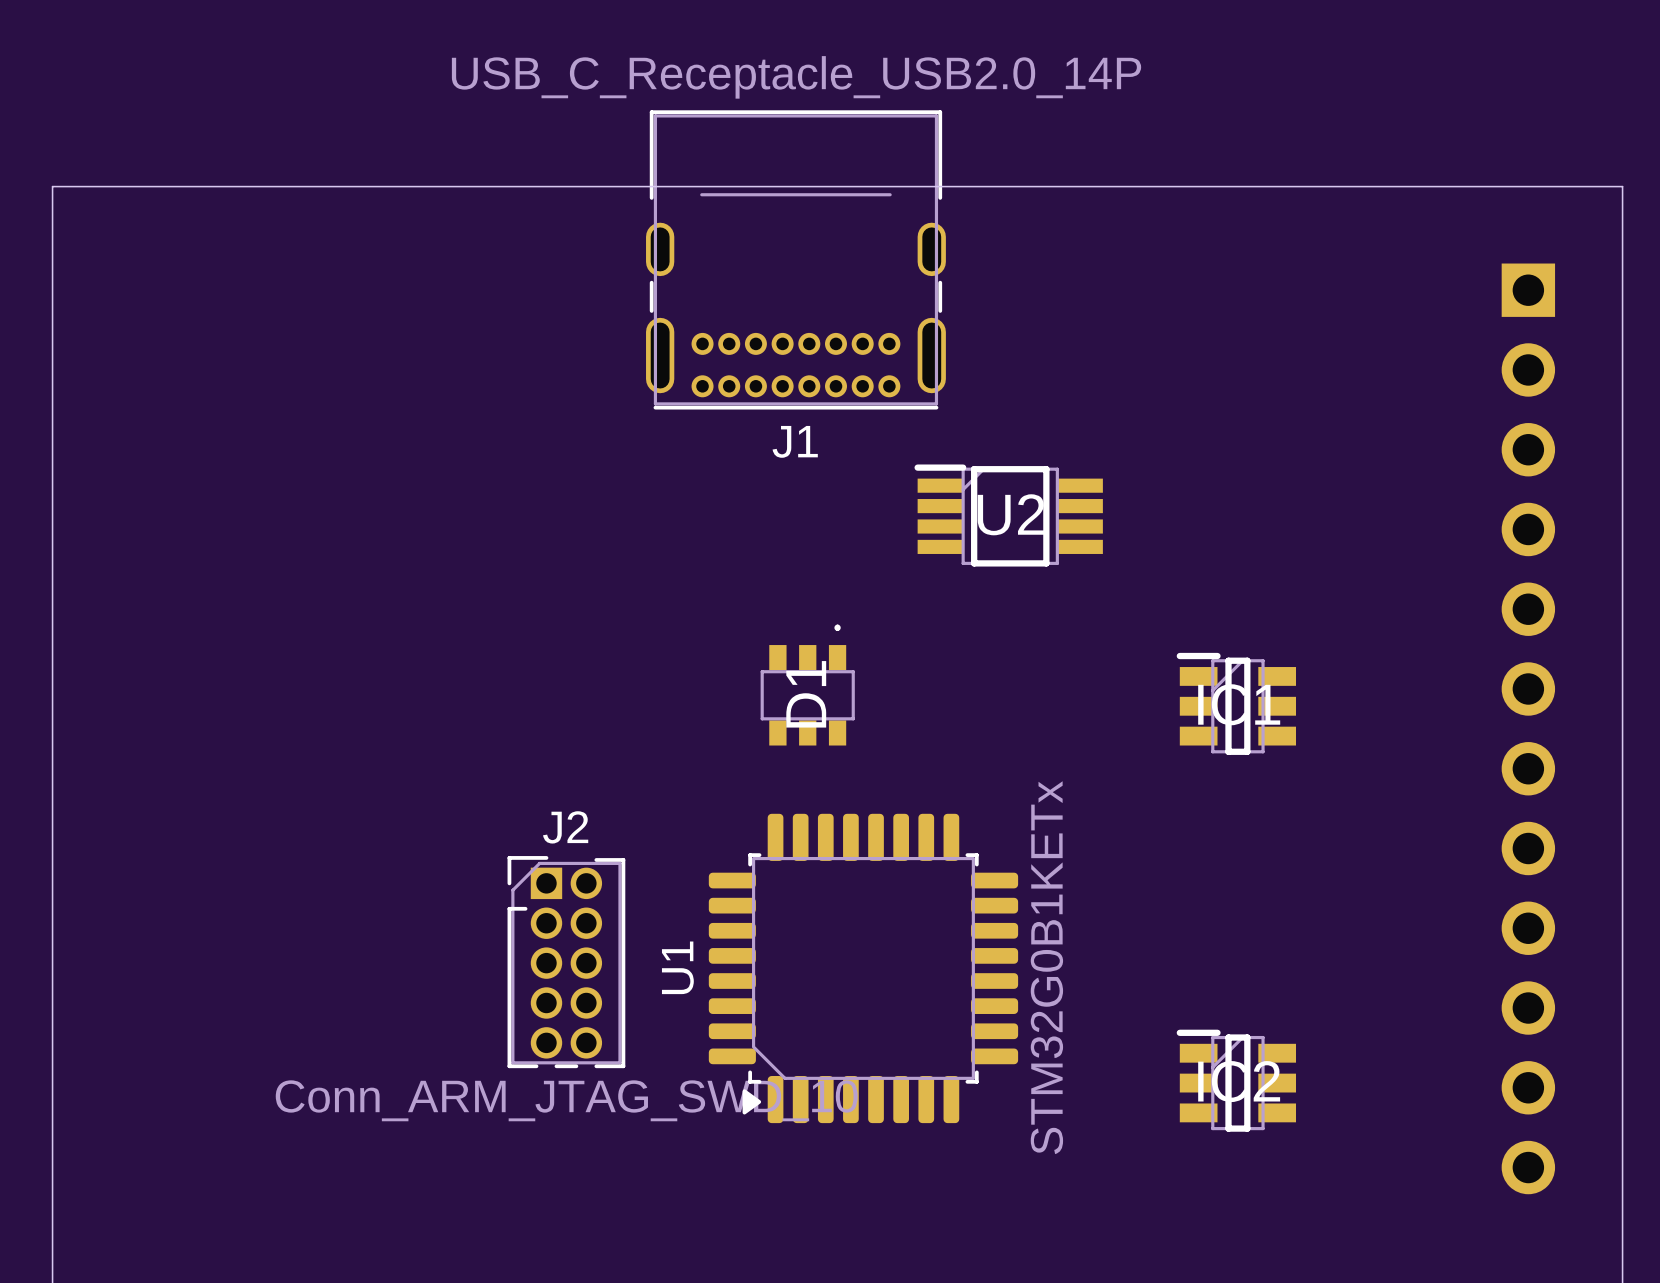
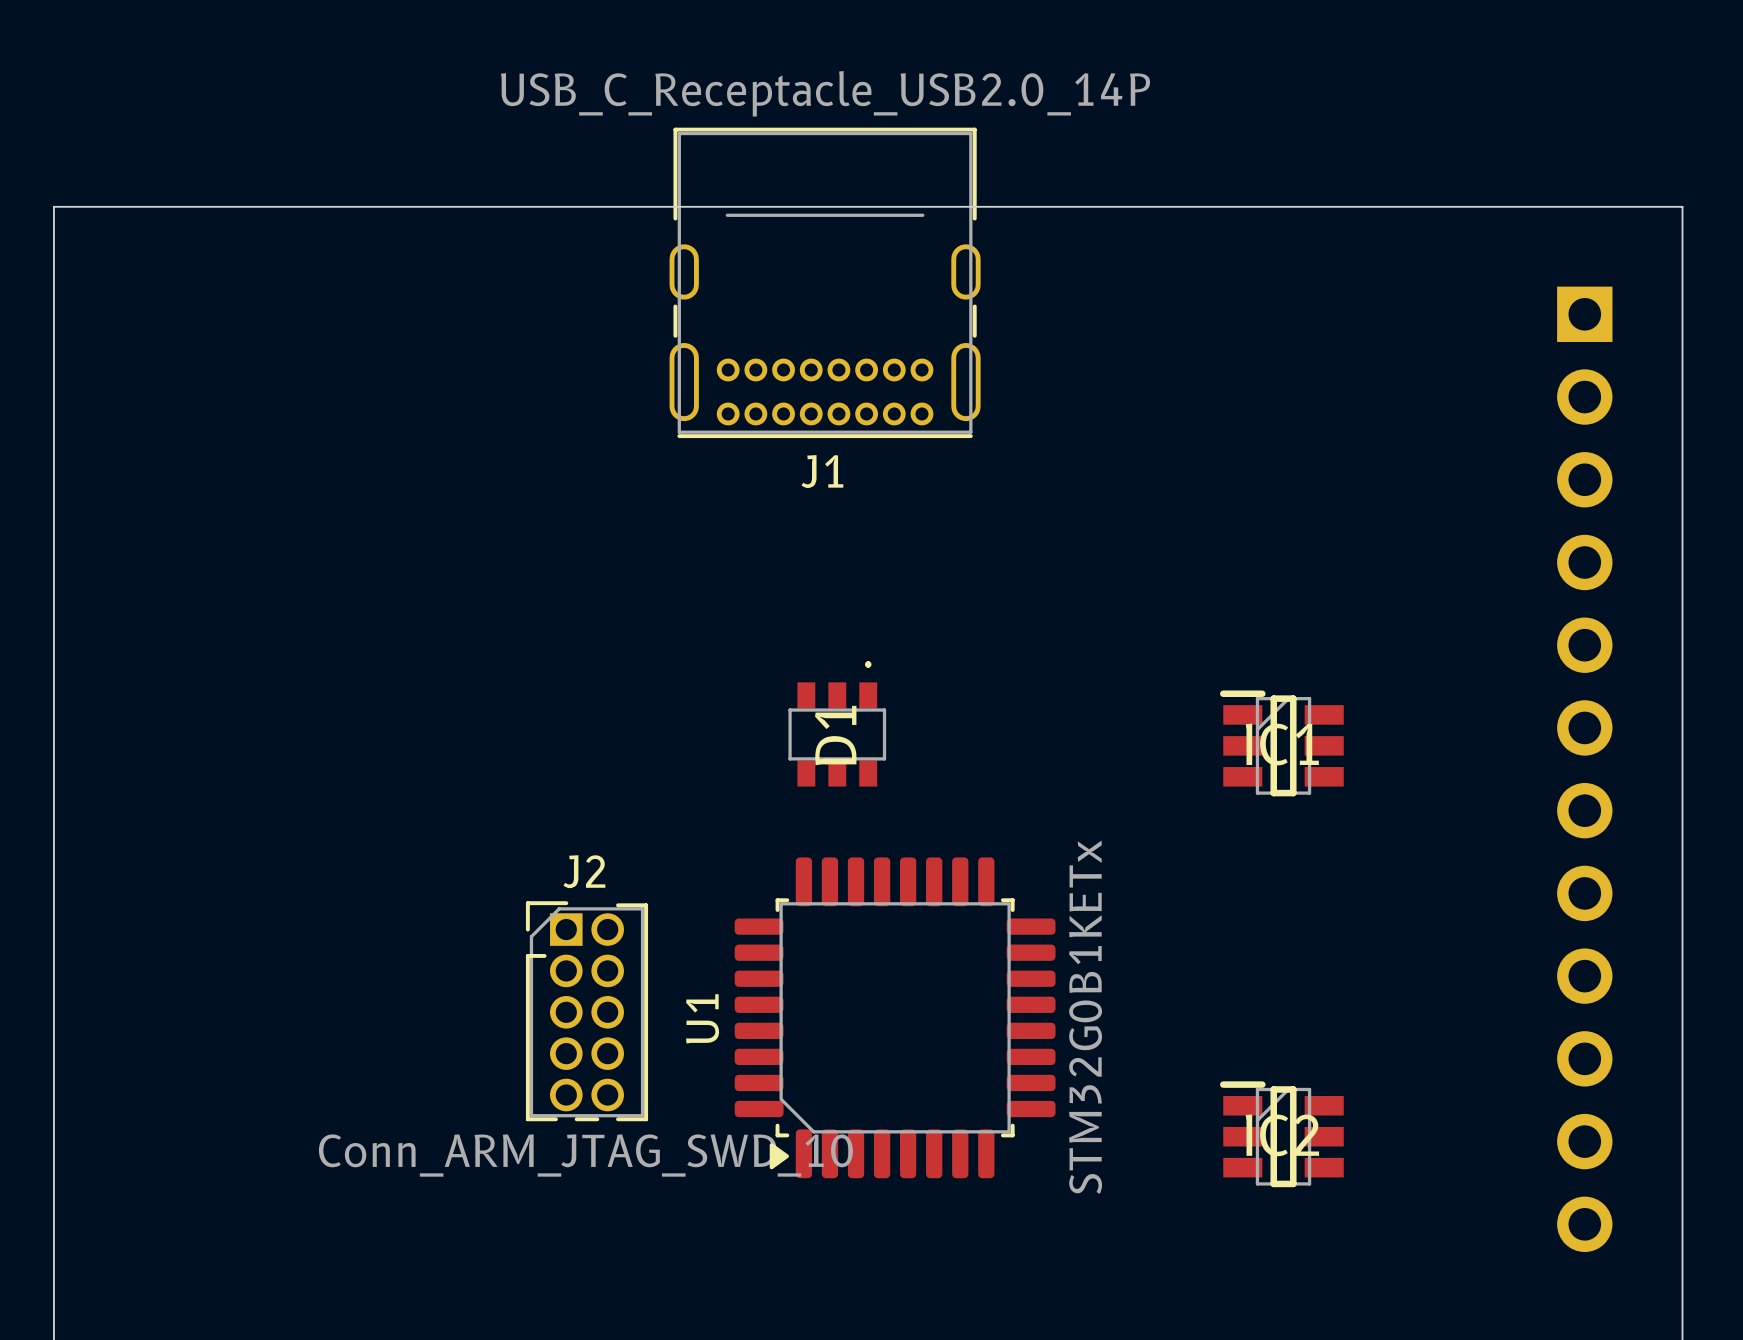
U2: (1008, 515) -> none

